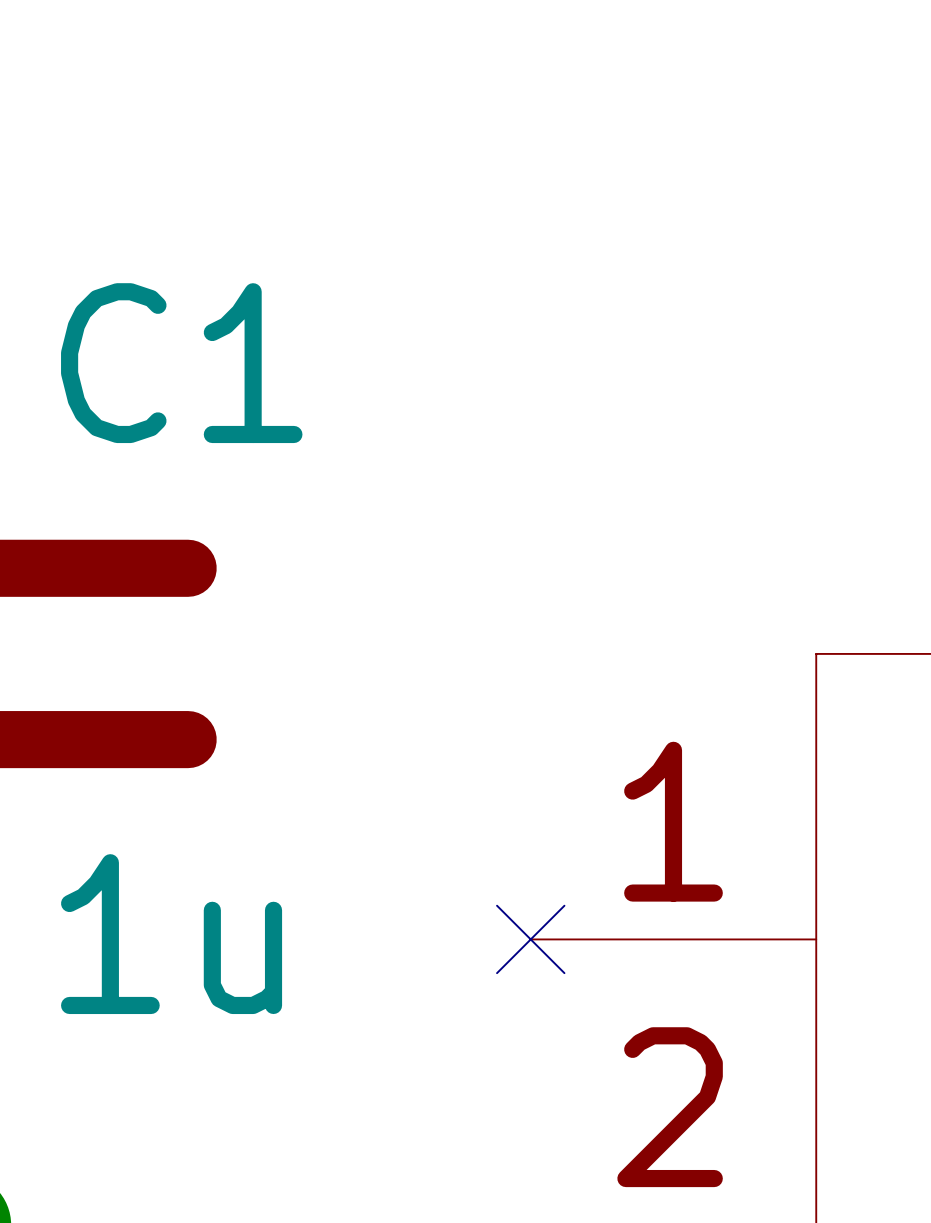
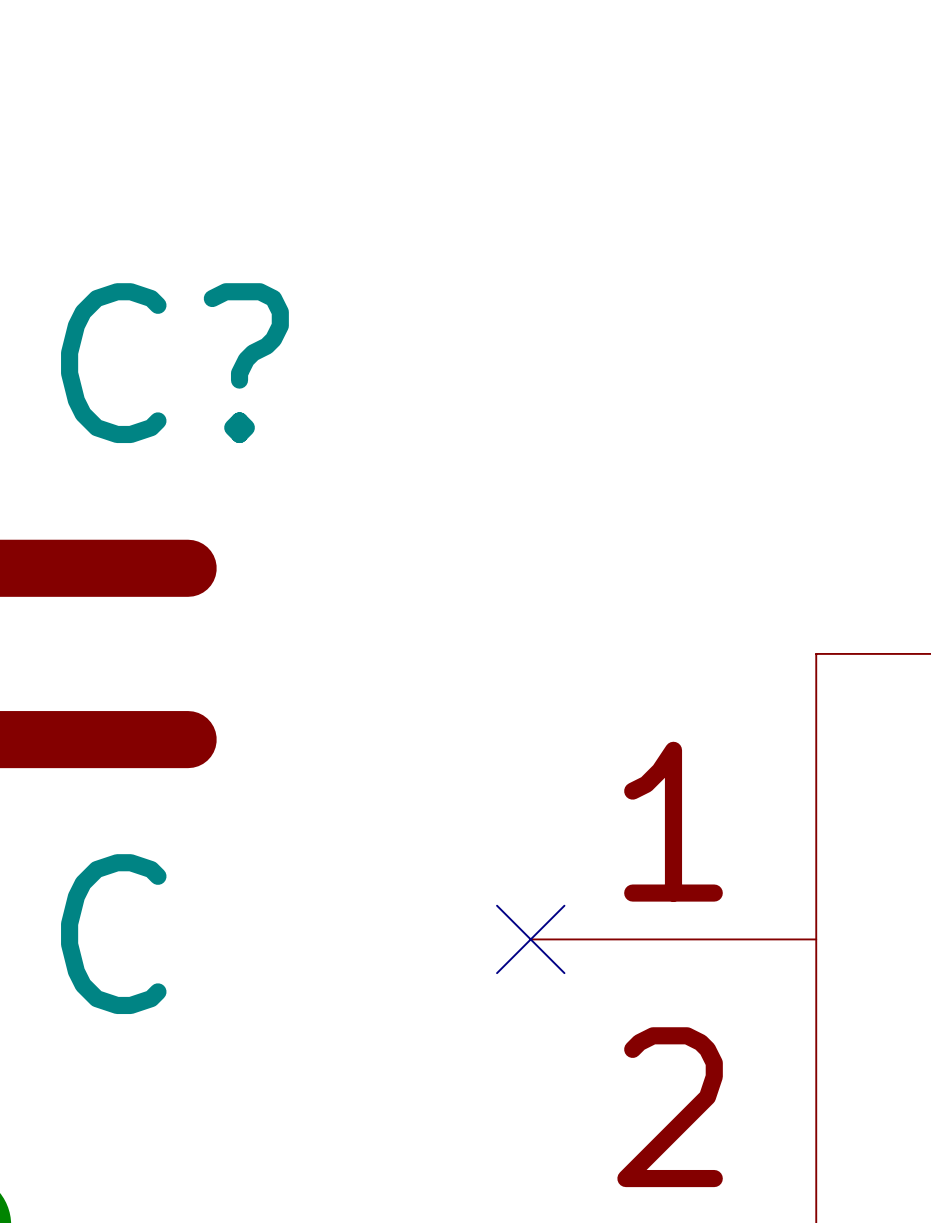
C1 name: C1 (181, 363) -> C? (174, 363)
C1 value: 1u (171, 934) -> C (113, 934)

